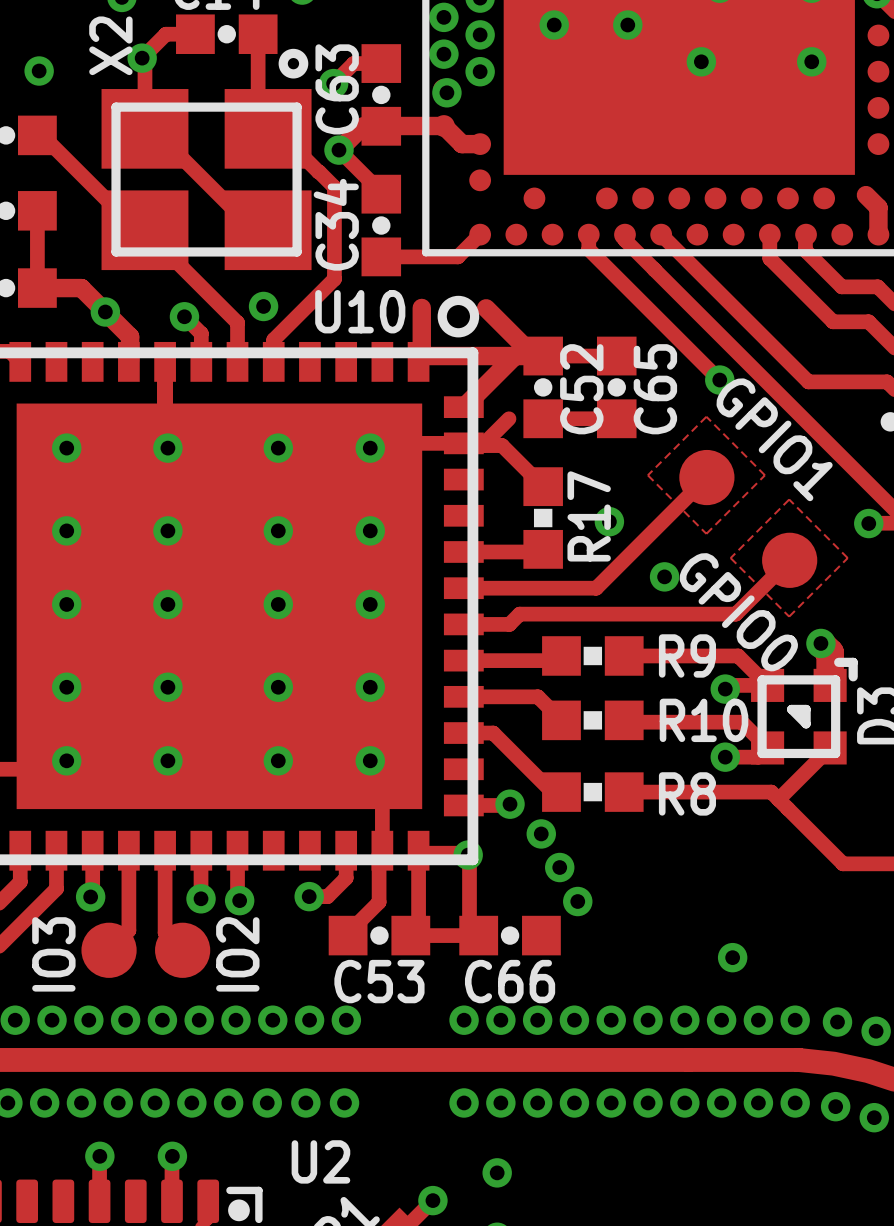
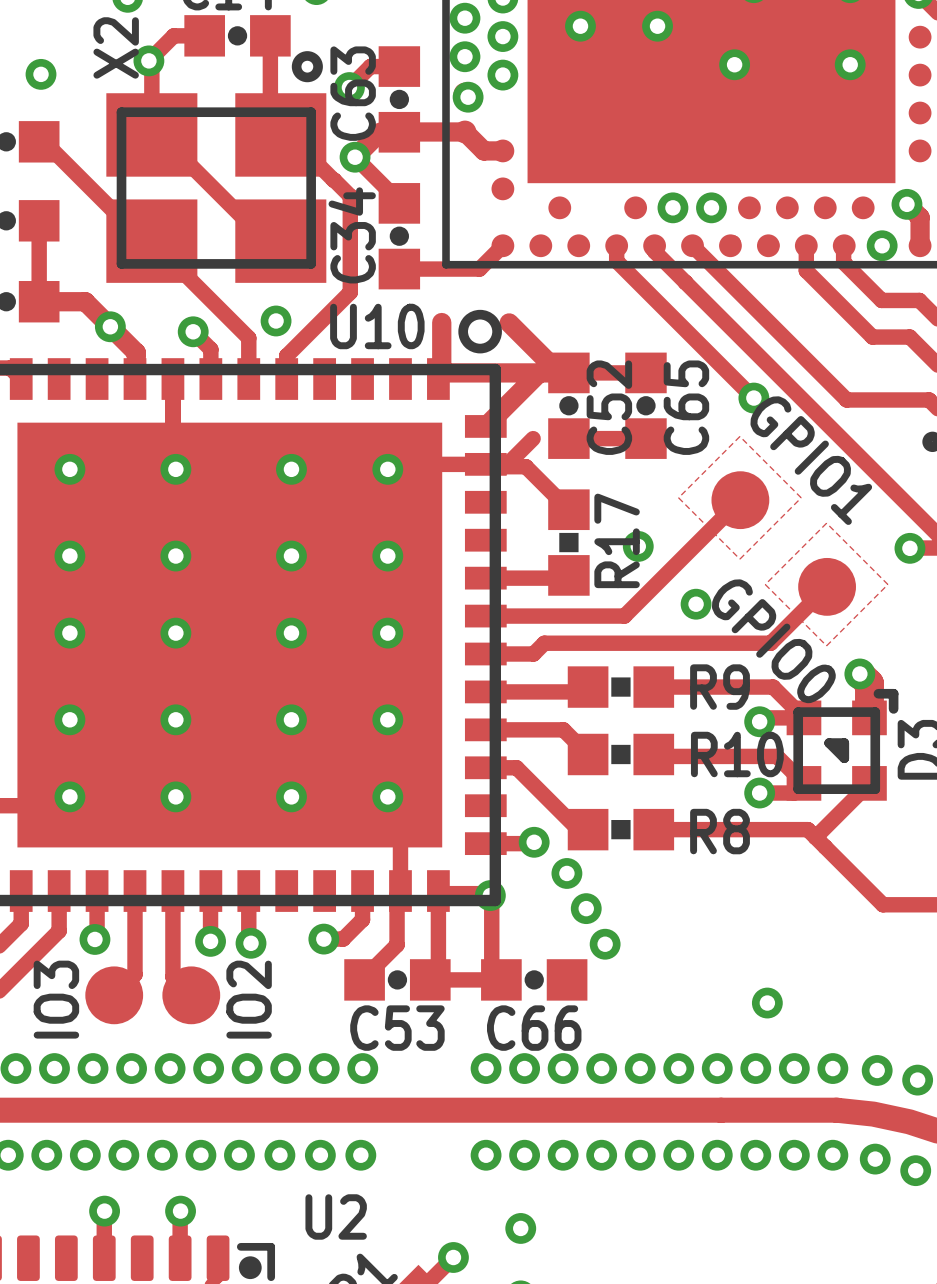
via: none -> (906, 204)
via: none -> (672, 207)
via: none -> (711, 207)
via: none -> (882, 245)

